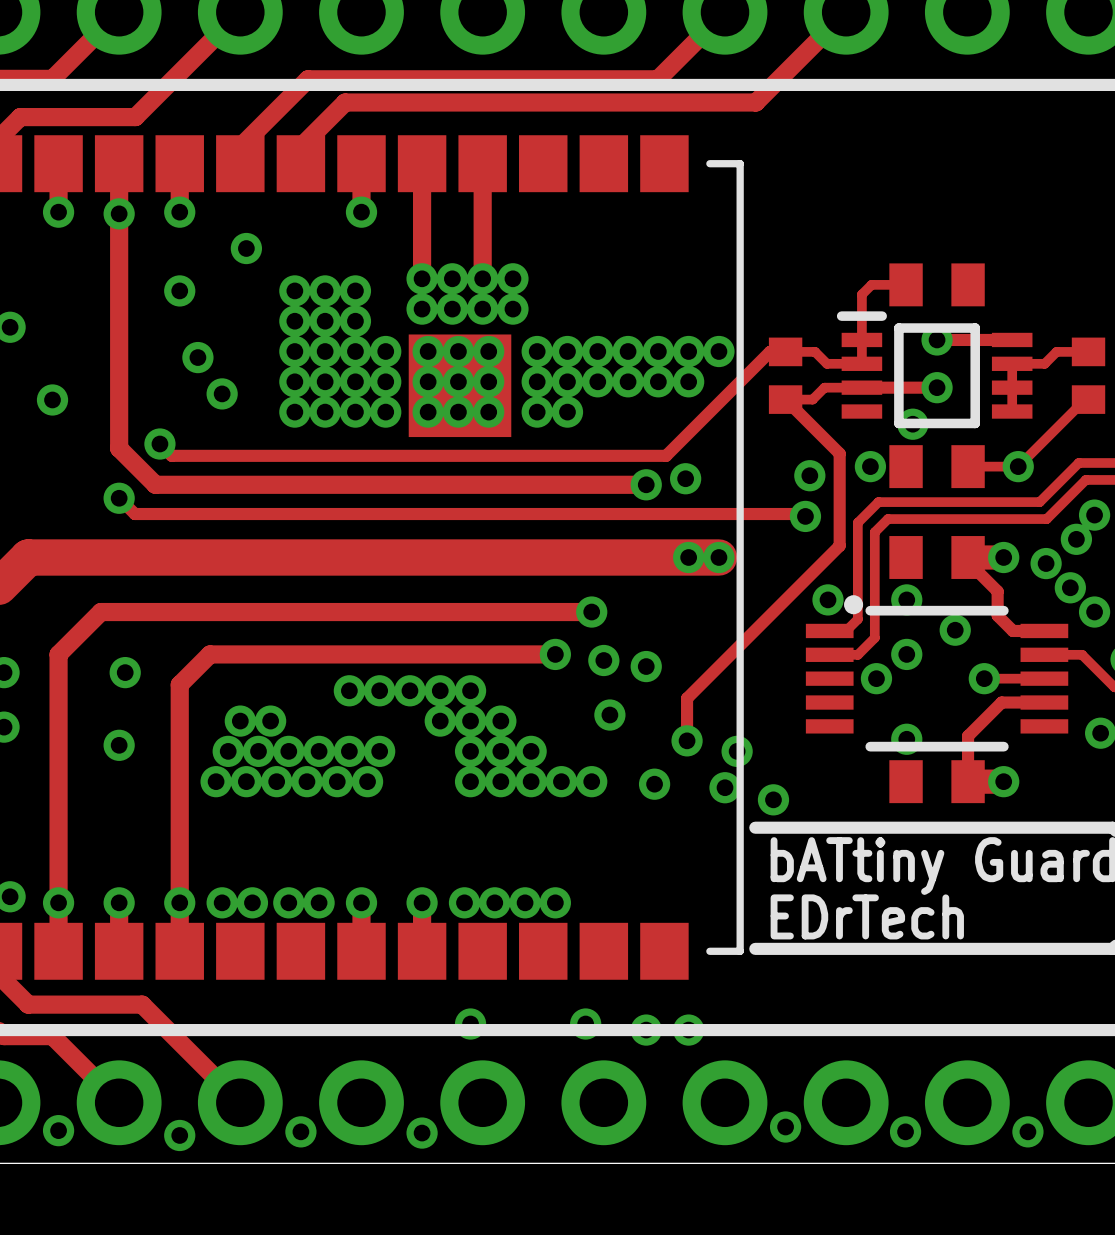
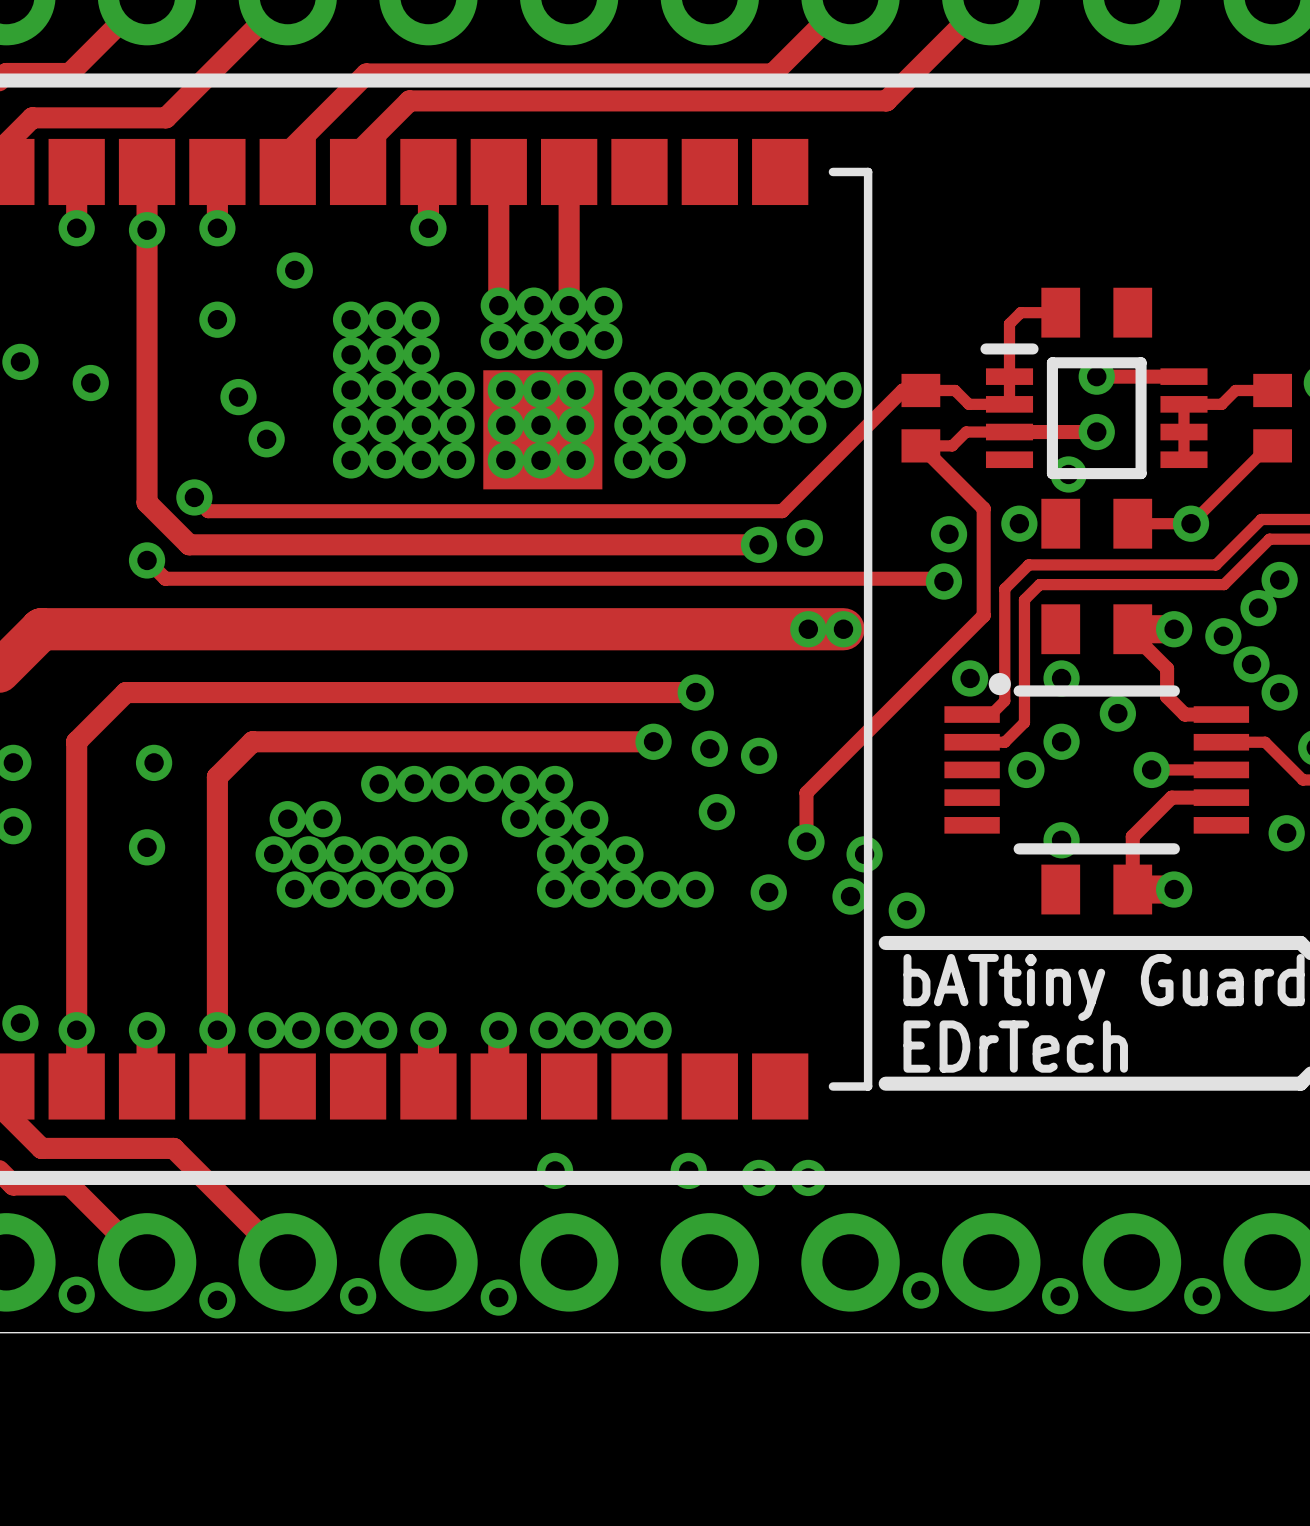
via position: (52, 399) -> (90, 383)
via position: (216, 781) -> (379, 784)

